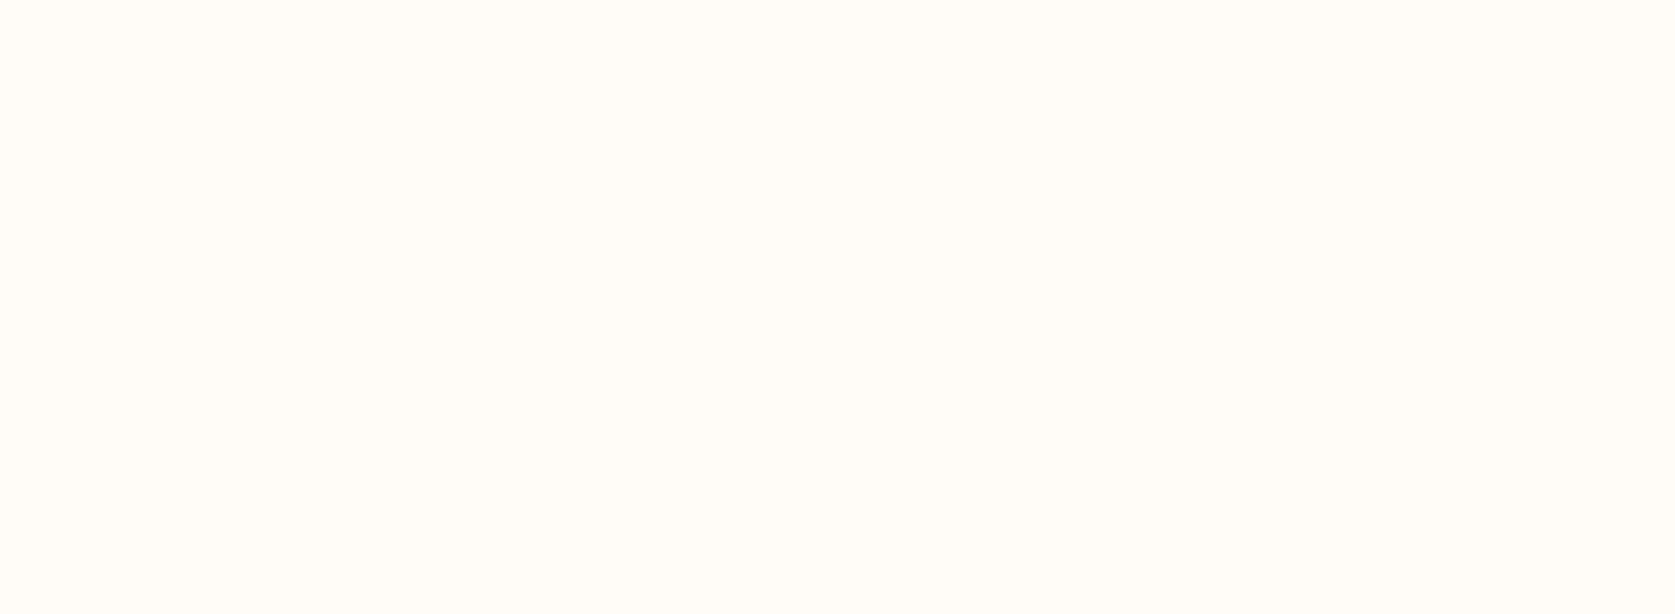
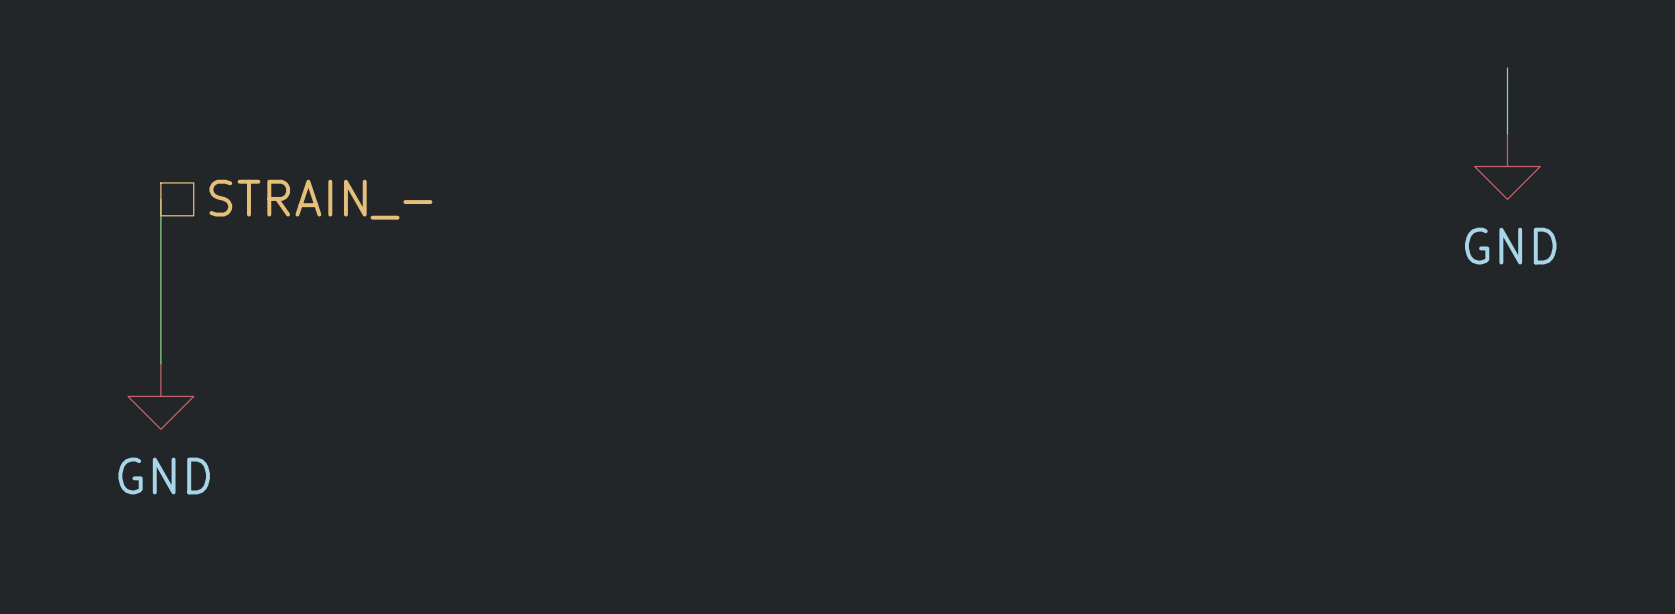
wire: none -> (1507, 67) (1507, 133)
power symbol: none -> GND (1507, 166)
wire: none -> (160, 199) (160, 363)
hierarchical label: none -> STRAIN_- (320, 199)
power symbol: none -> GND (160, 396)

